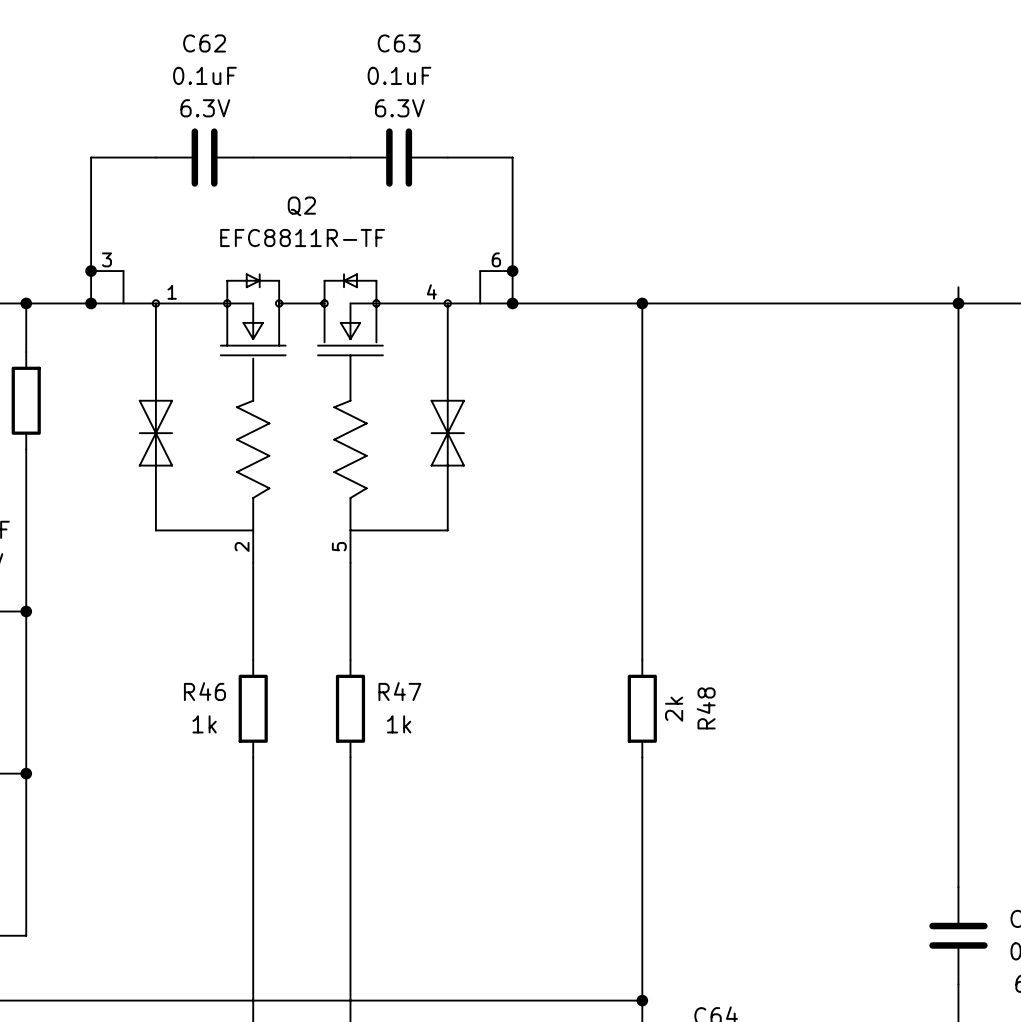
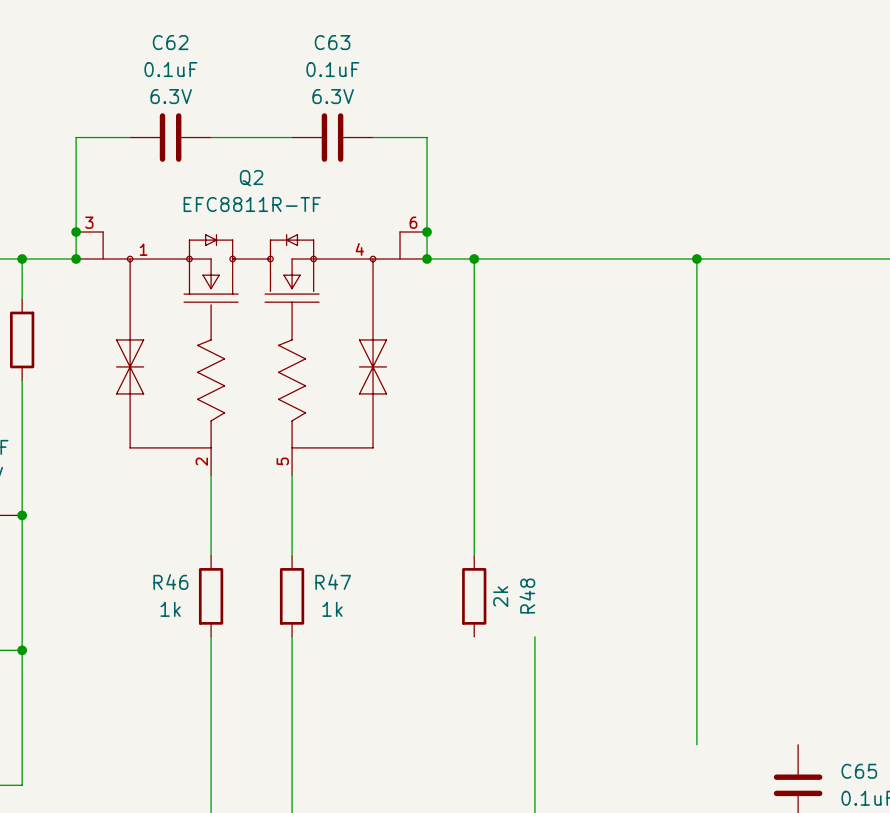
wire: (958, 287) (958, 887) -> none
wire: (642, 303) (642, 660) -> (474, 258) (474, 555)
junction position: (642, 303) -> (474, 258)
wire: none -> (696, 258) (696, 744)
junction: none -> (696, 258)
junction: (958, 303) -> none
R48 position: (642, 708) -> (474, 596)

